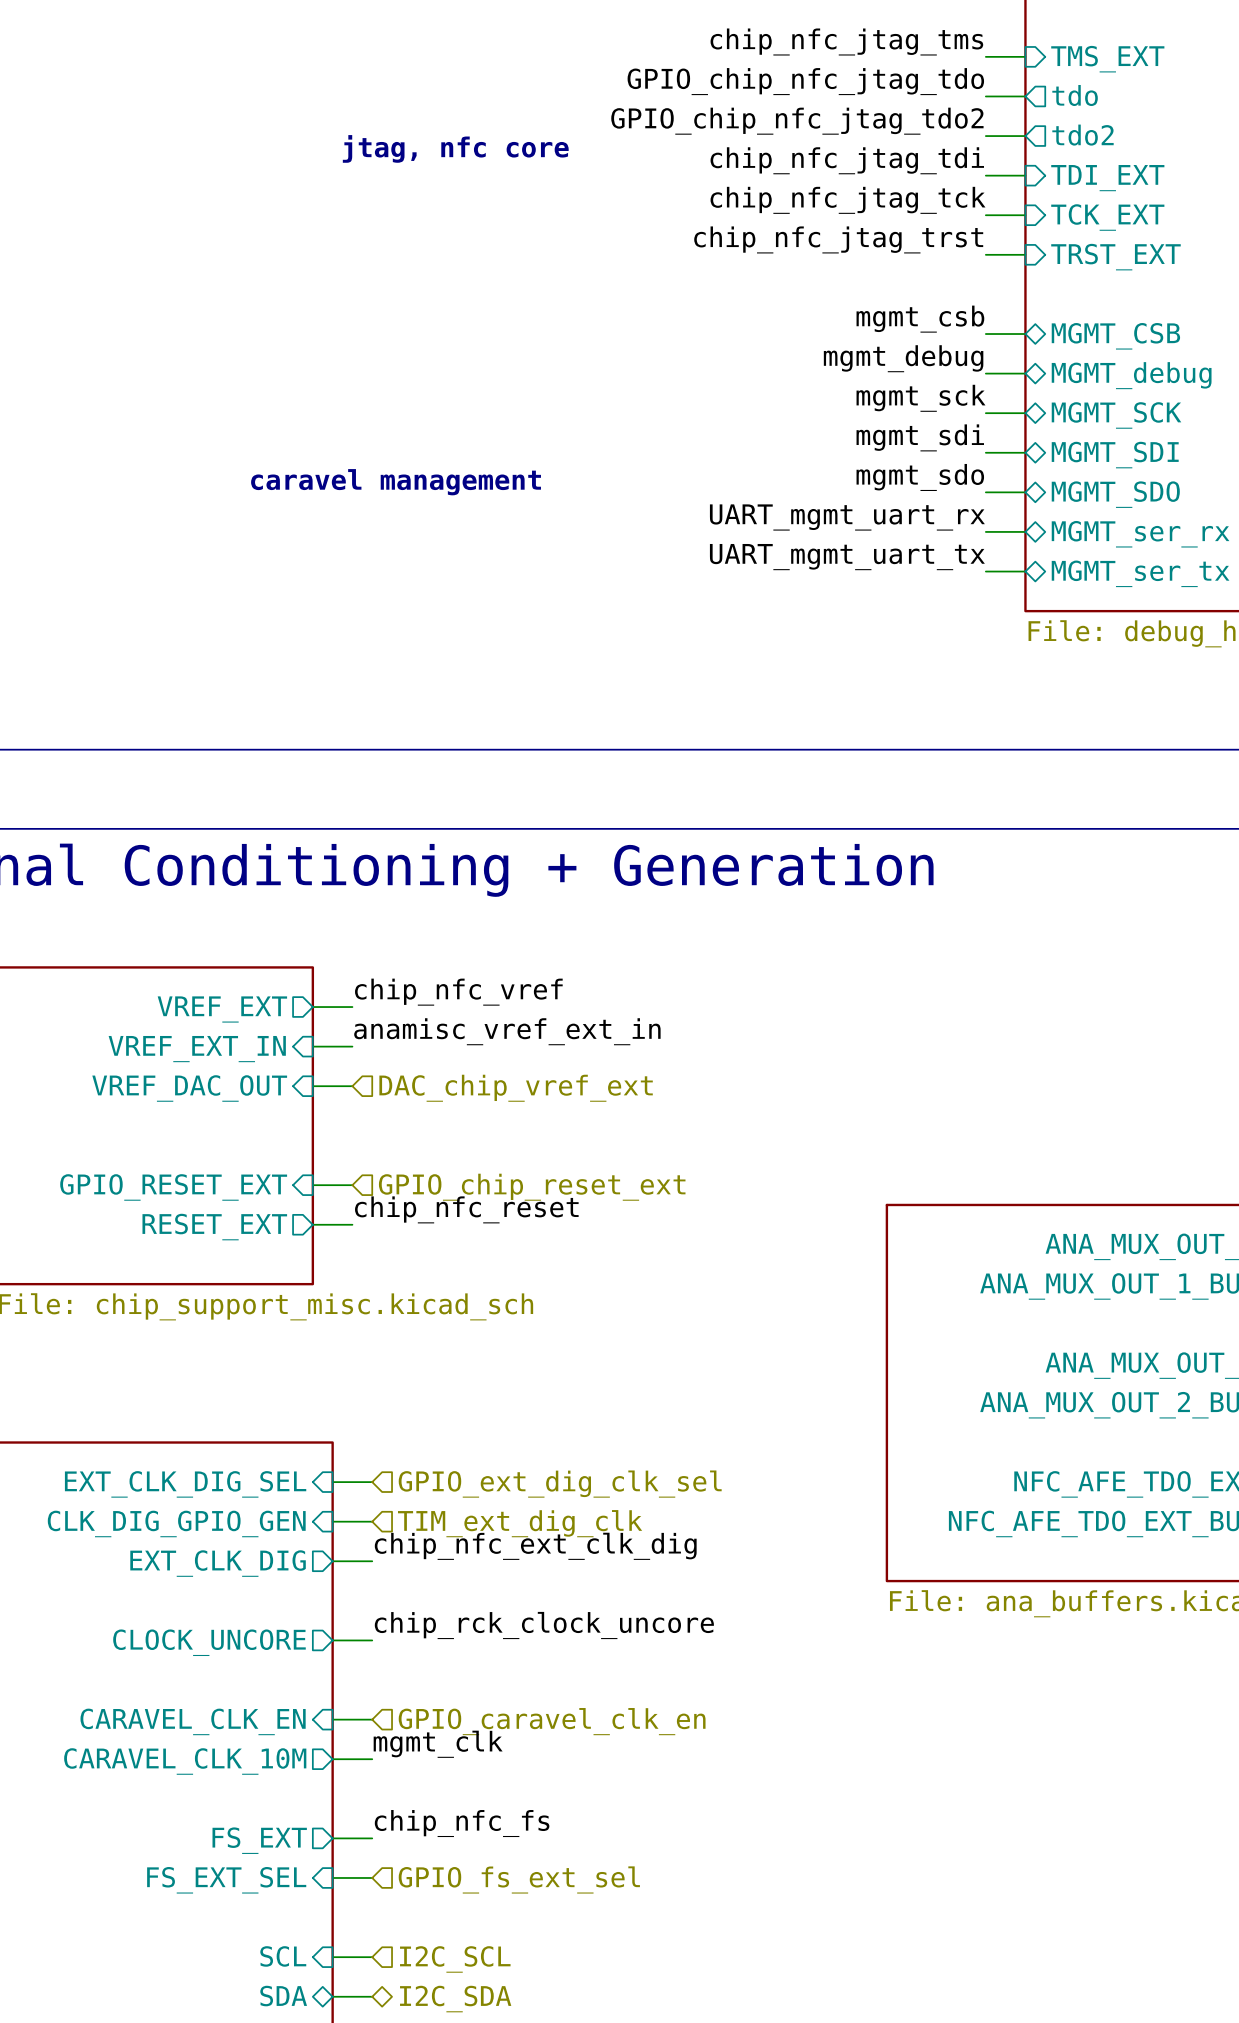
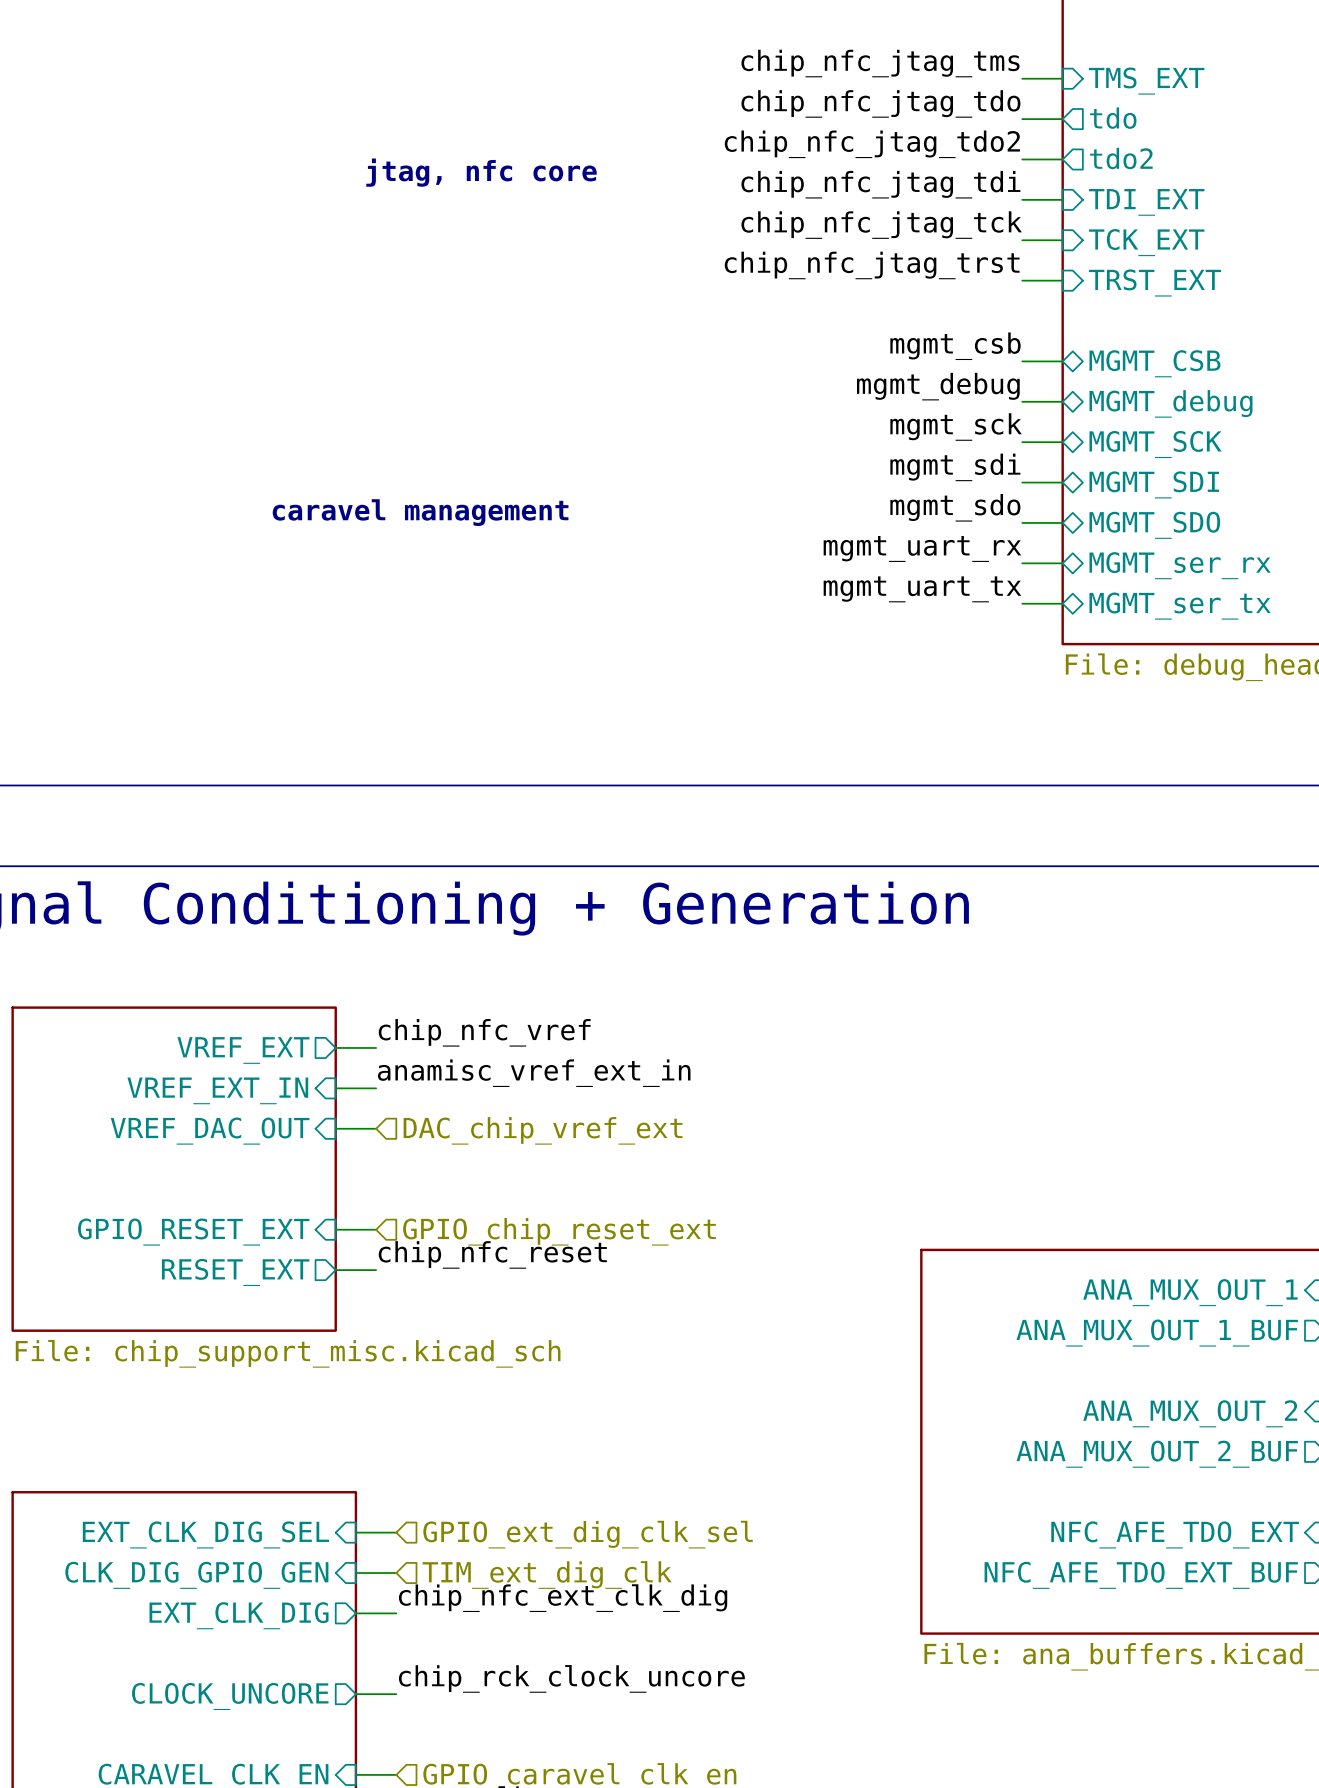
label: GPIO_chip_nfc_jtag_tdo (805, 81) -> chip_nfc_jtag_tdo (880, 103)
label: GPIO_chip_nfc_jtag_tdo2 (797, 121) -> chip_nfc_jtag_tdo2 (872, 144)
label: UART_mgmt_uart_rx (847, 517) -> mgmt_uart_rx (922, 548)
label: UART_mgmt_uart_tx (847, 557) -> mgmt_uart_tx (922, 589)

